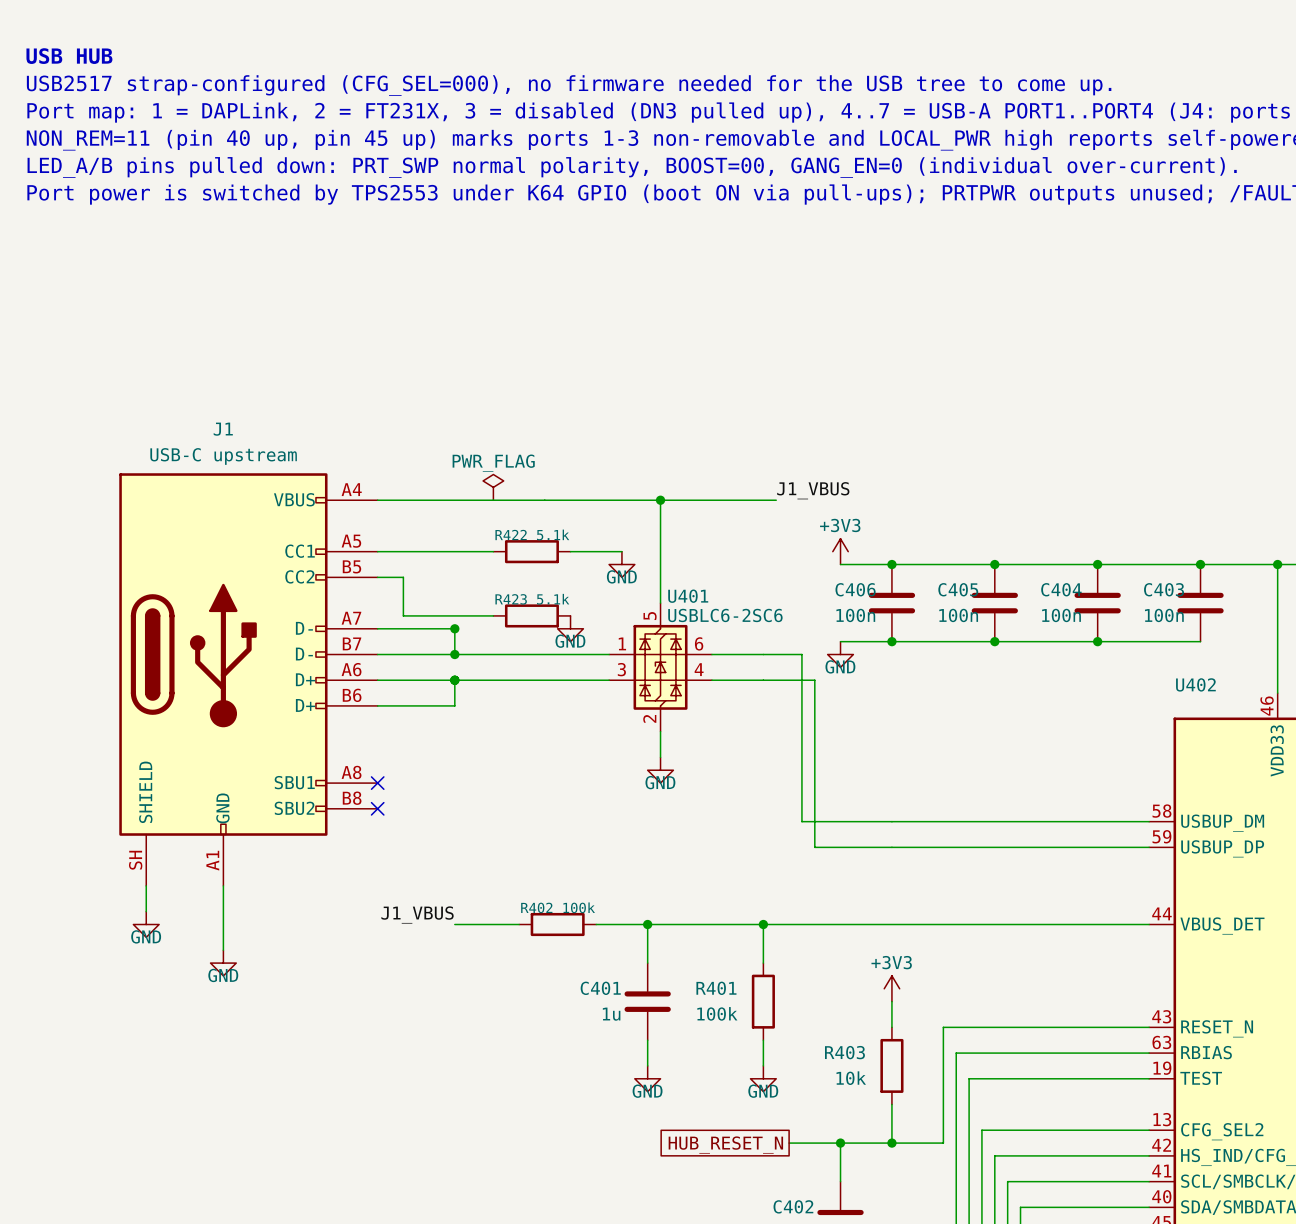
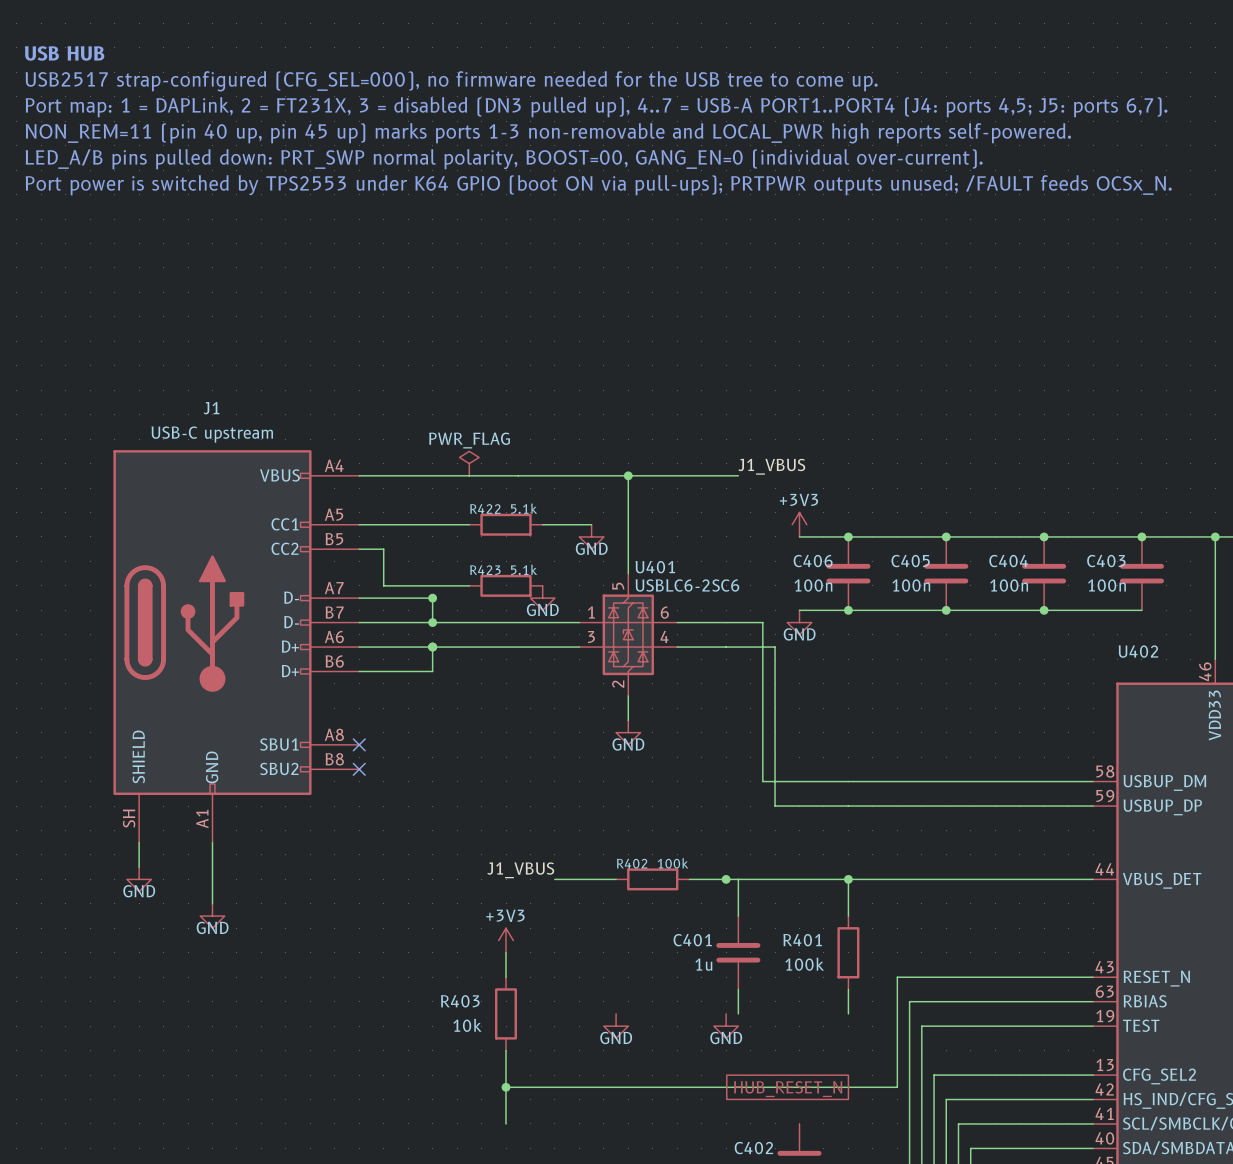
label position: J1_VBUS (417, 915) -> J1_VBUS (520, 870)
wire: (454, 924) (519, 924) -> none
R402 position: (557, 924) -> (652, 879)
junction: (647, 924) -> none
wire: (724, 924) (647, 924) (647, 963) -> none
wire: (763, 924) (763, 963) -> (848, 879) (848, 916)
junction: none -> (848, 879)
power symbol: none -> +3V3 (506, 940)
power symbol: +3V3 (891, 988) -> none
wire: none -> (506, 952) (506, 977)
C401 position: (647, 1001) -> (738, 952)
R401 position: (763, 1001) -> (848, 952)
wire: (891, 1001) (891, 1027) -> none
wire: (647, 1040) (647, 1065) -> (738, 989) (738, 1013)
wire: (763, 1040) (763, 1065) -> (848, 989) (848, 1013)
R403 position: (891, 1065) -> (506, 1013)
wire: none -> (506, 1050) (506, 1123)
wire: (891, 1104) (891, 1143) -> none
wire: none -> (506, 1087) (750, 1087)
junction: none -> (506, 1087)
wire: (840, 1143) (840, 1181) -> (738, 879) (738, 916)
junction: (840, 1143) -> none
junction: (891, 1143) -> none
global label position: HUB_RESET_N (725, 1145) -> HUB_RESET_N (788, 1089)

